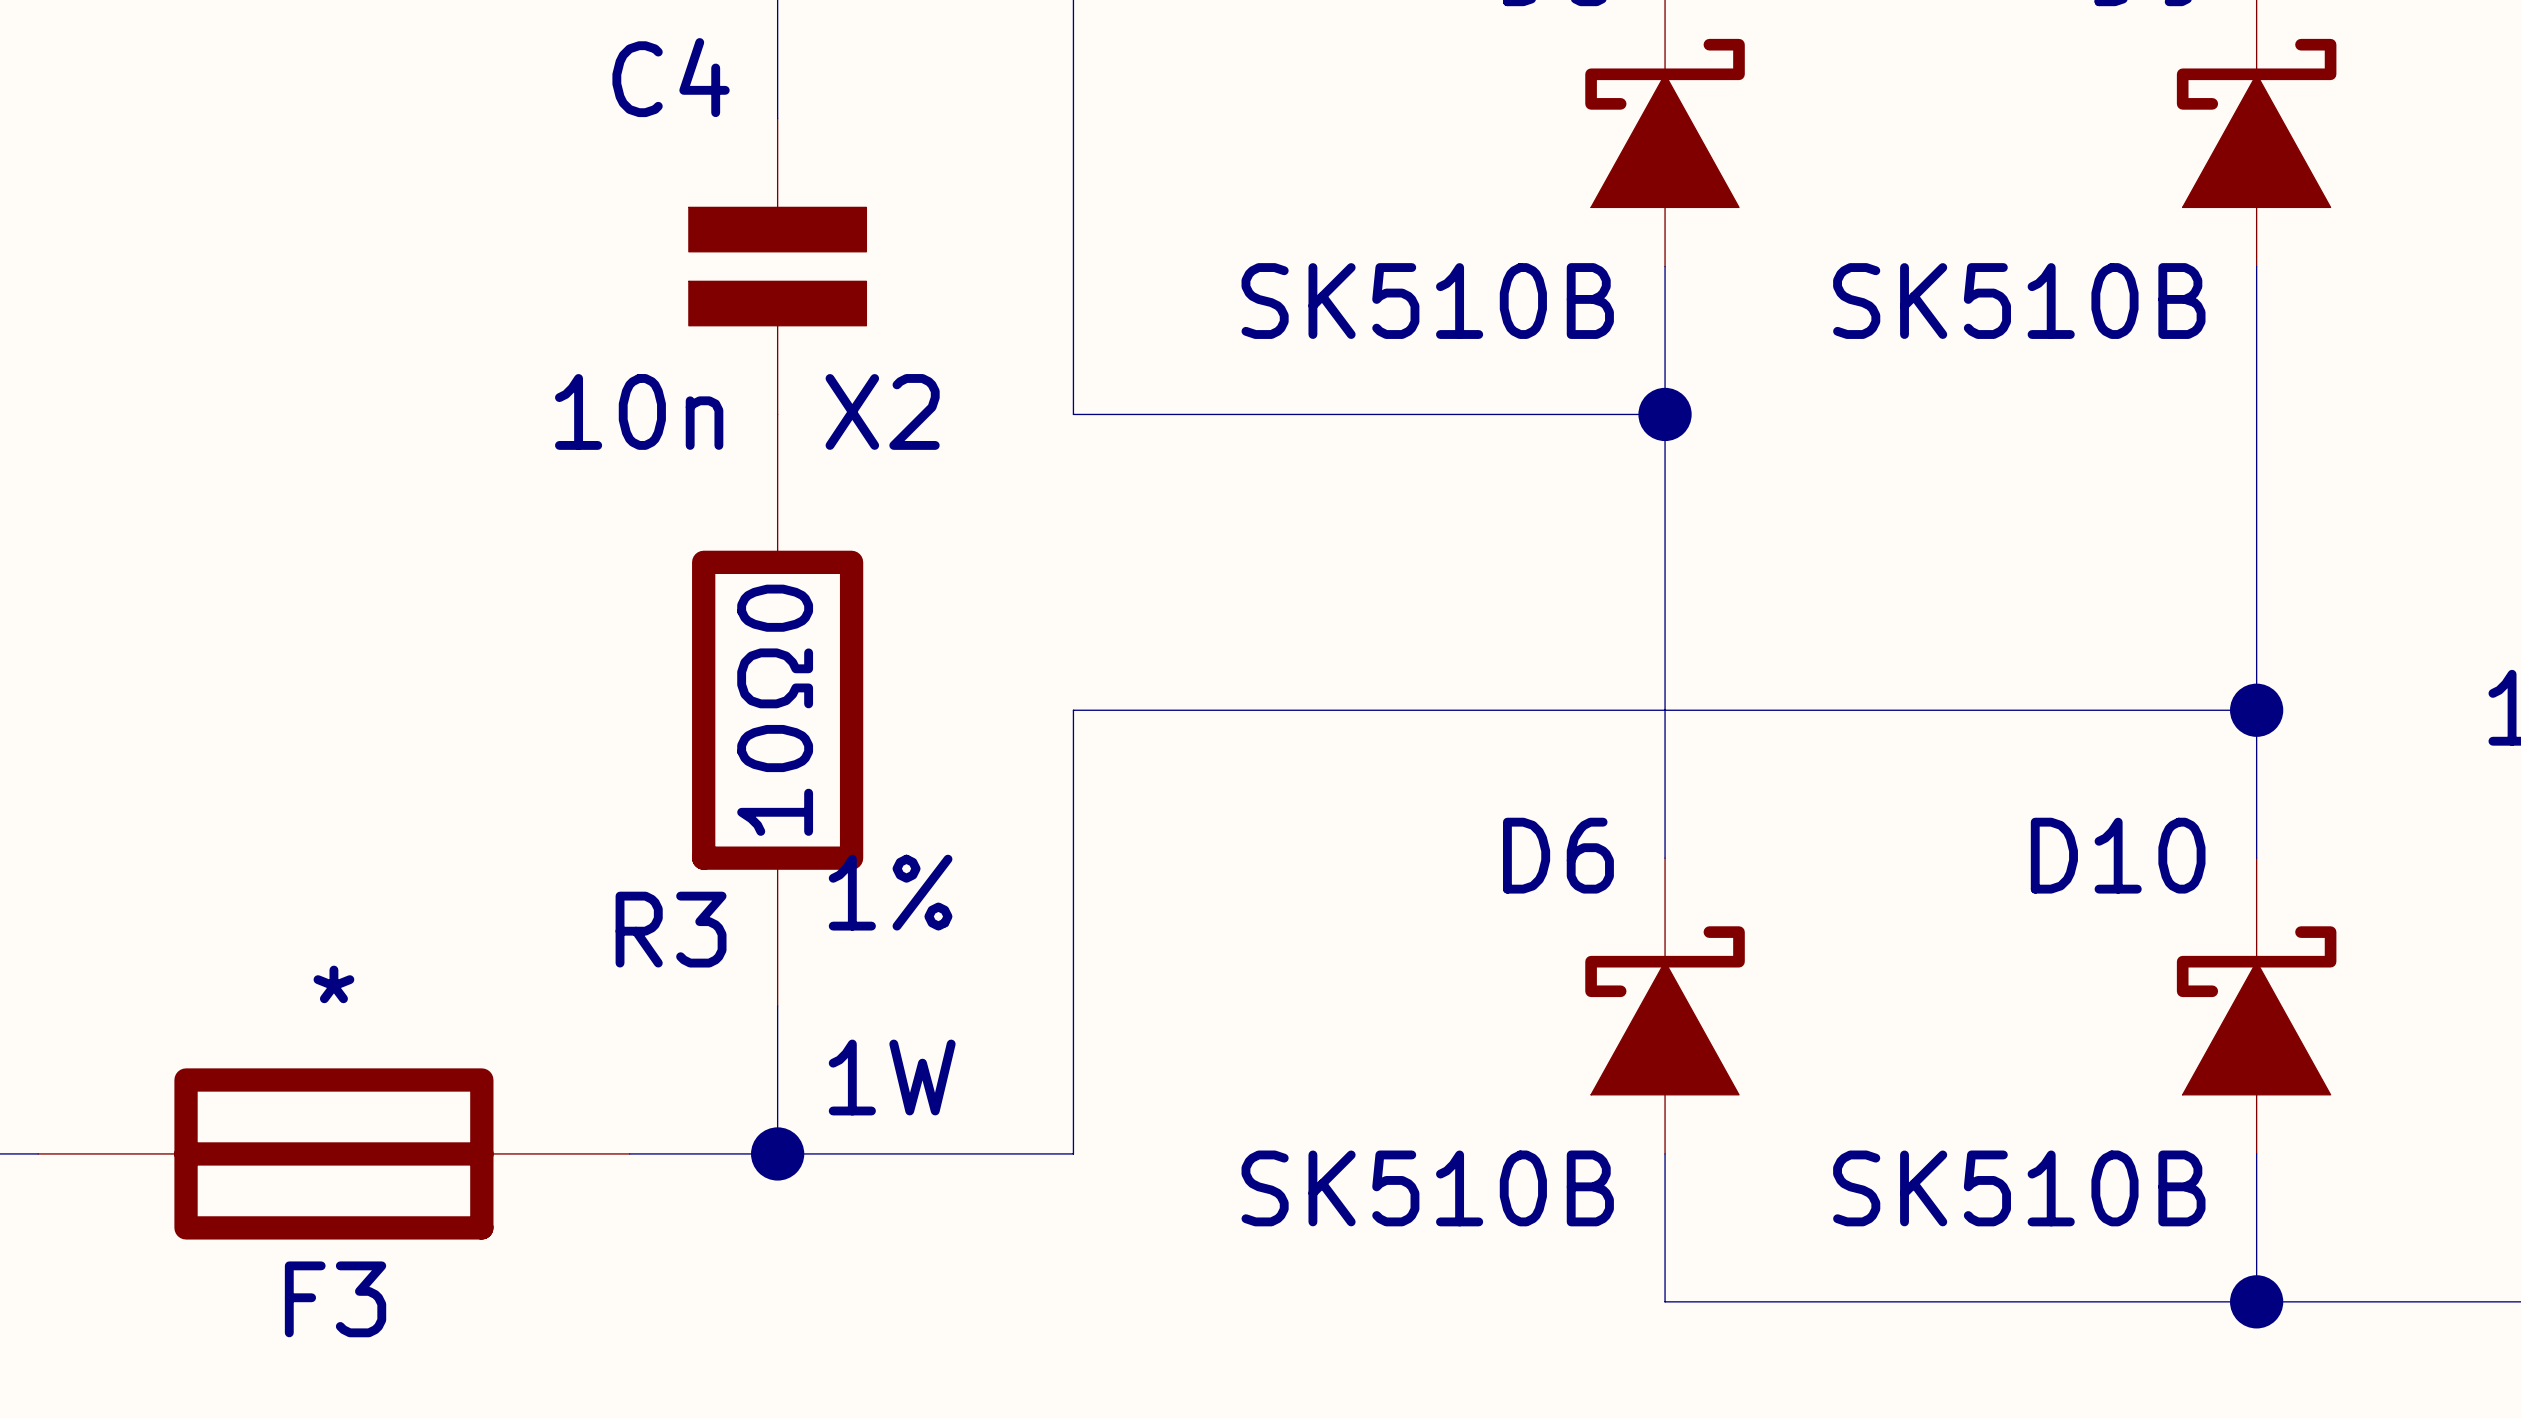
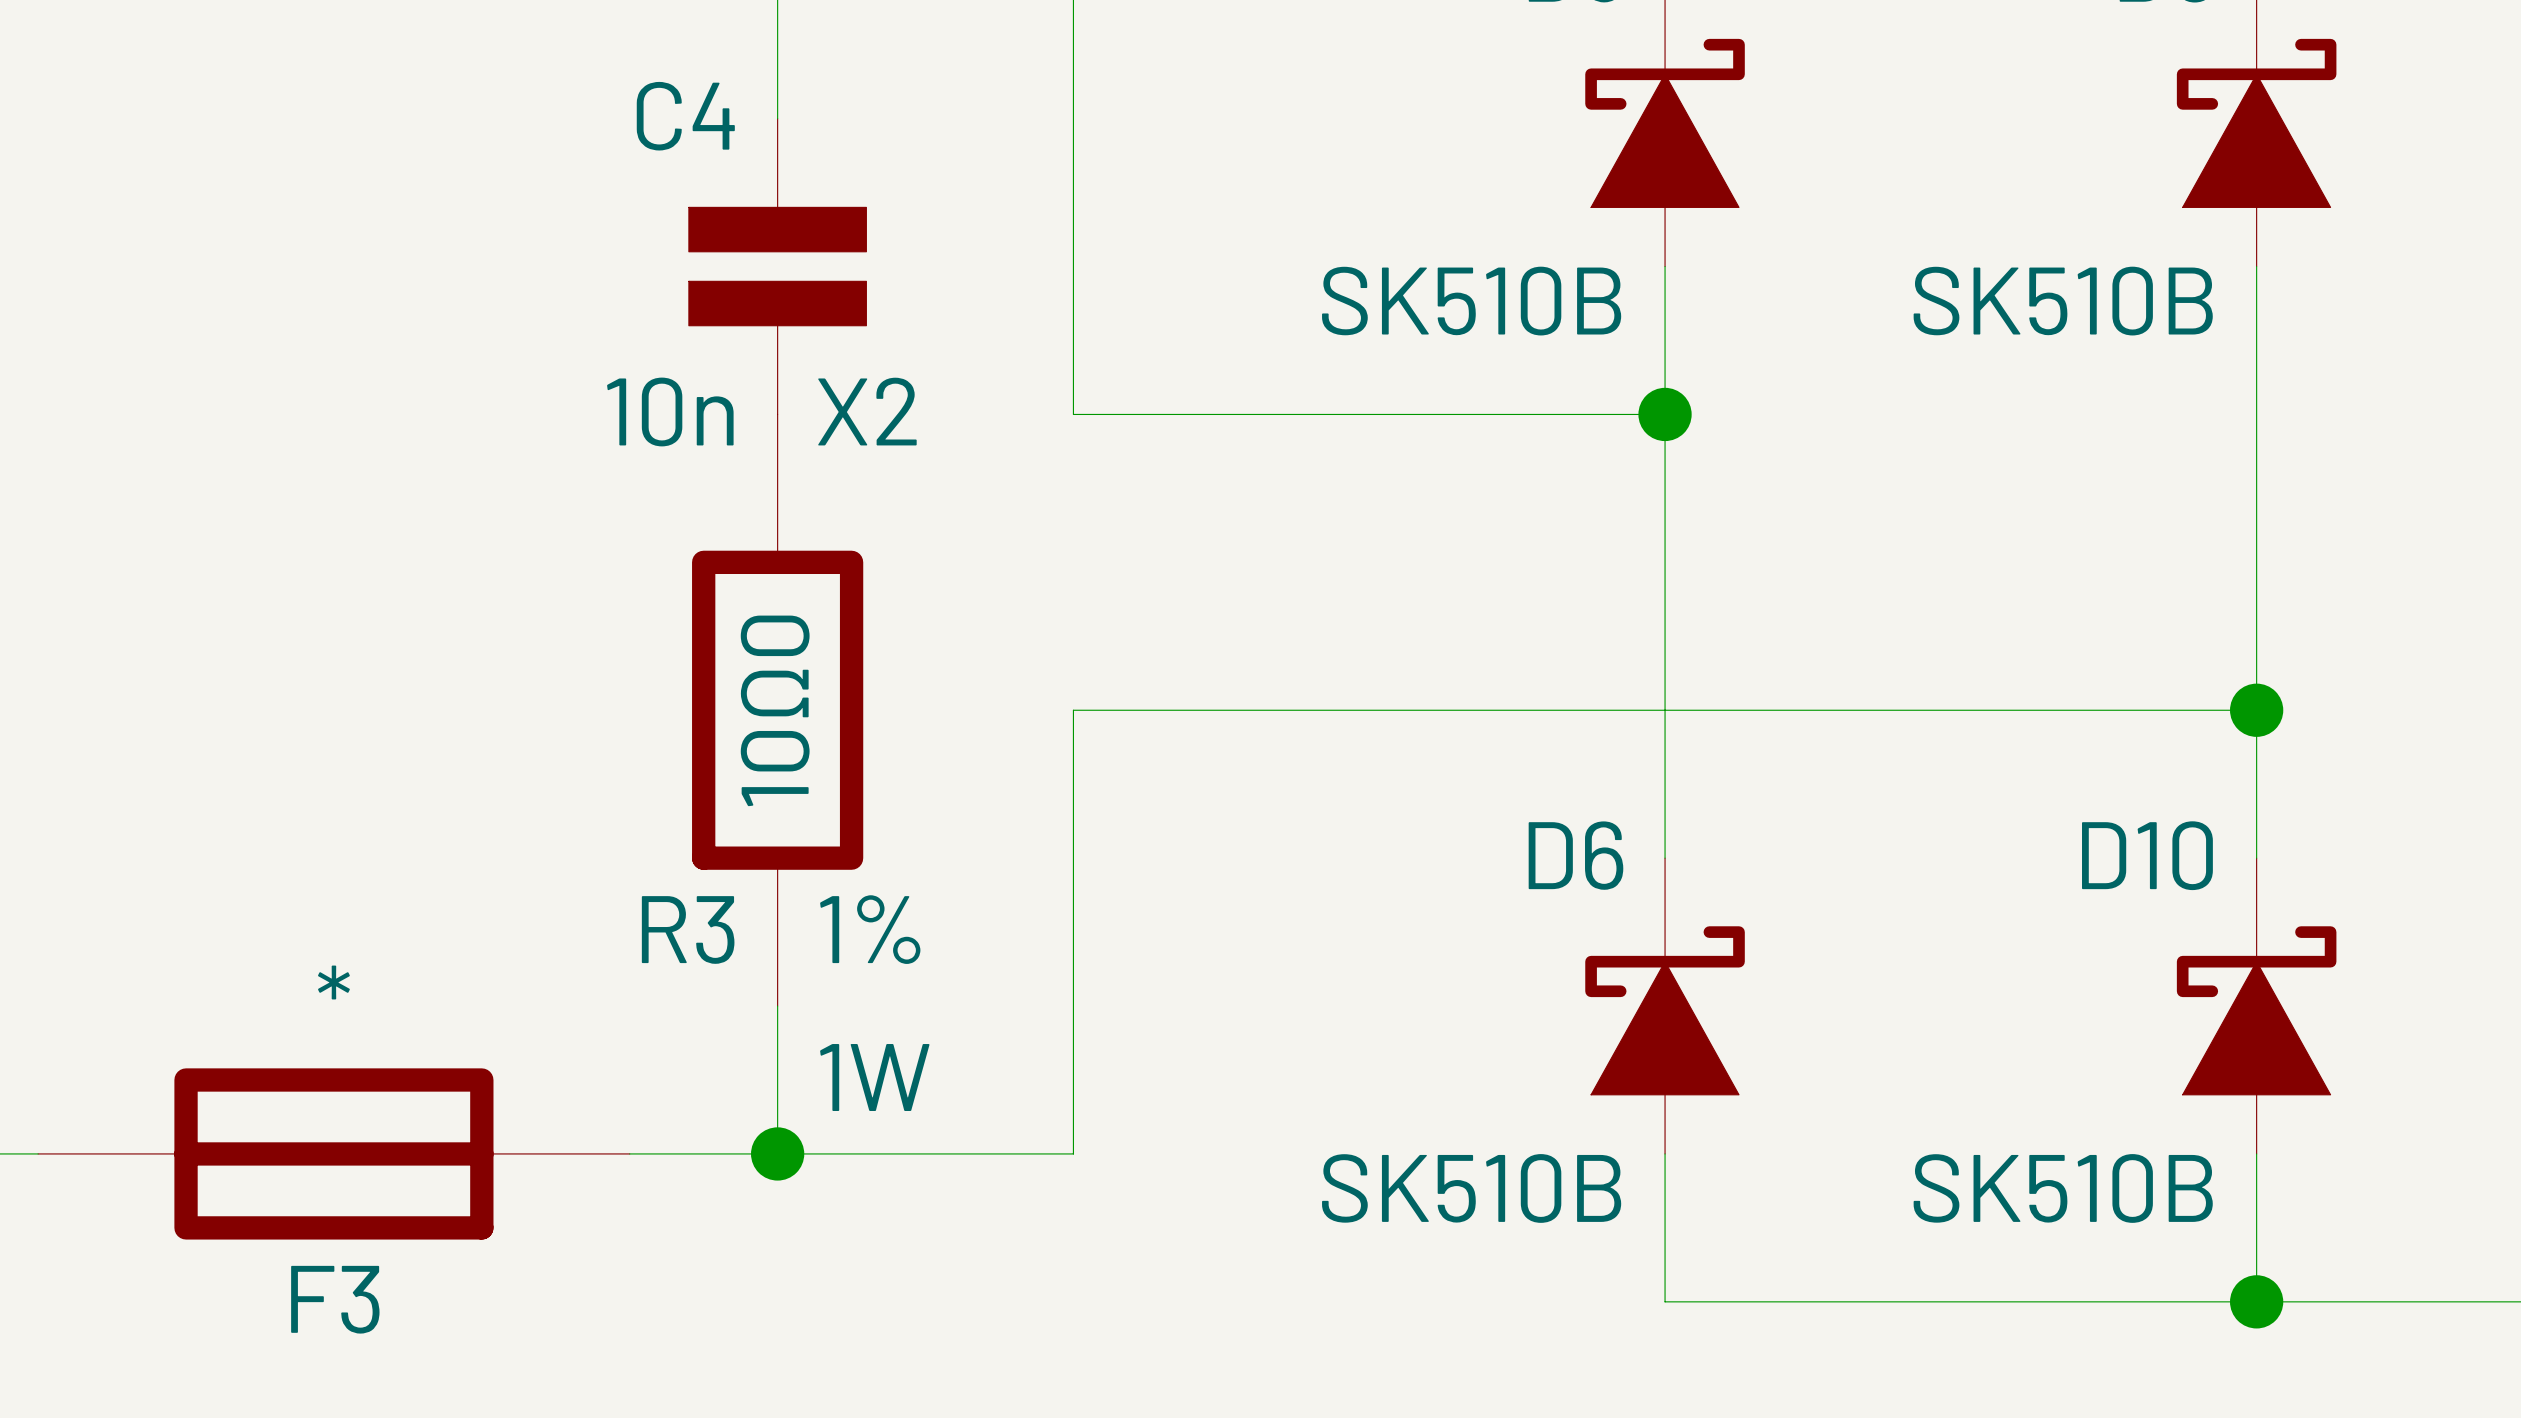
C4 name position: C4 (671, 77) -> C4 (685, 116)
R3 text position: 1% (890, 892) -> 1% (870, 929)

